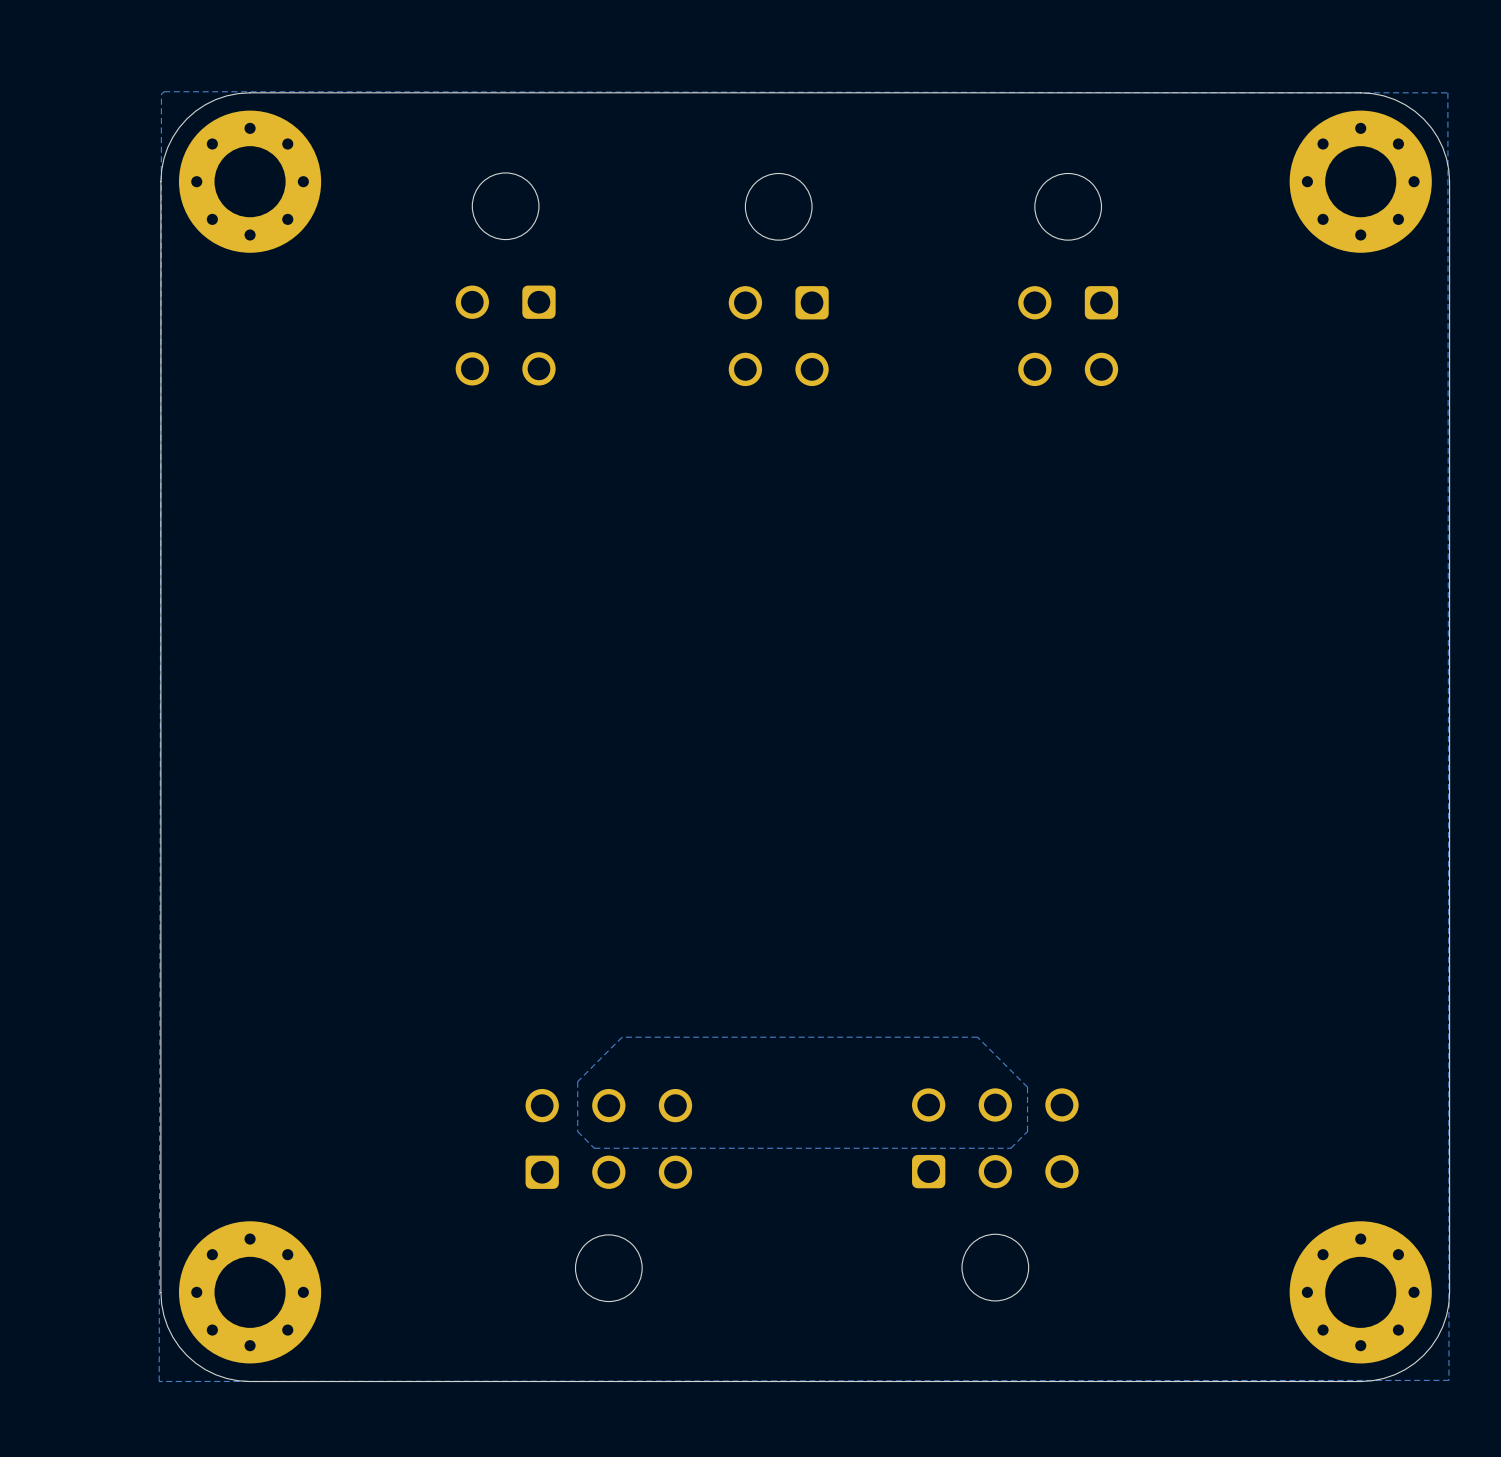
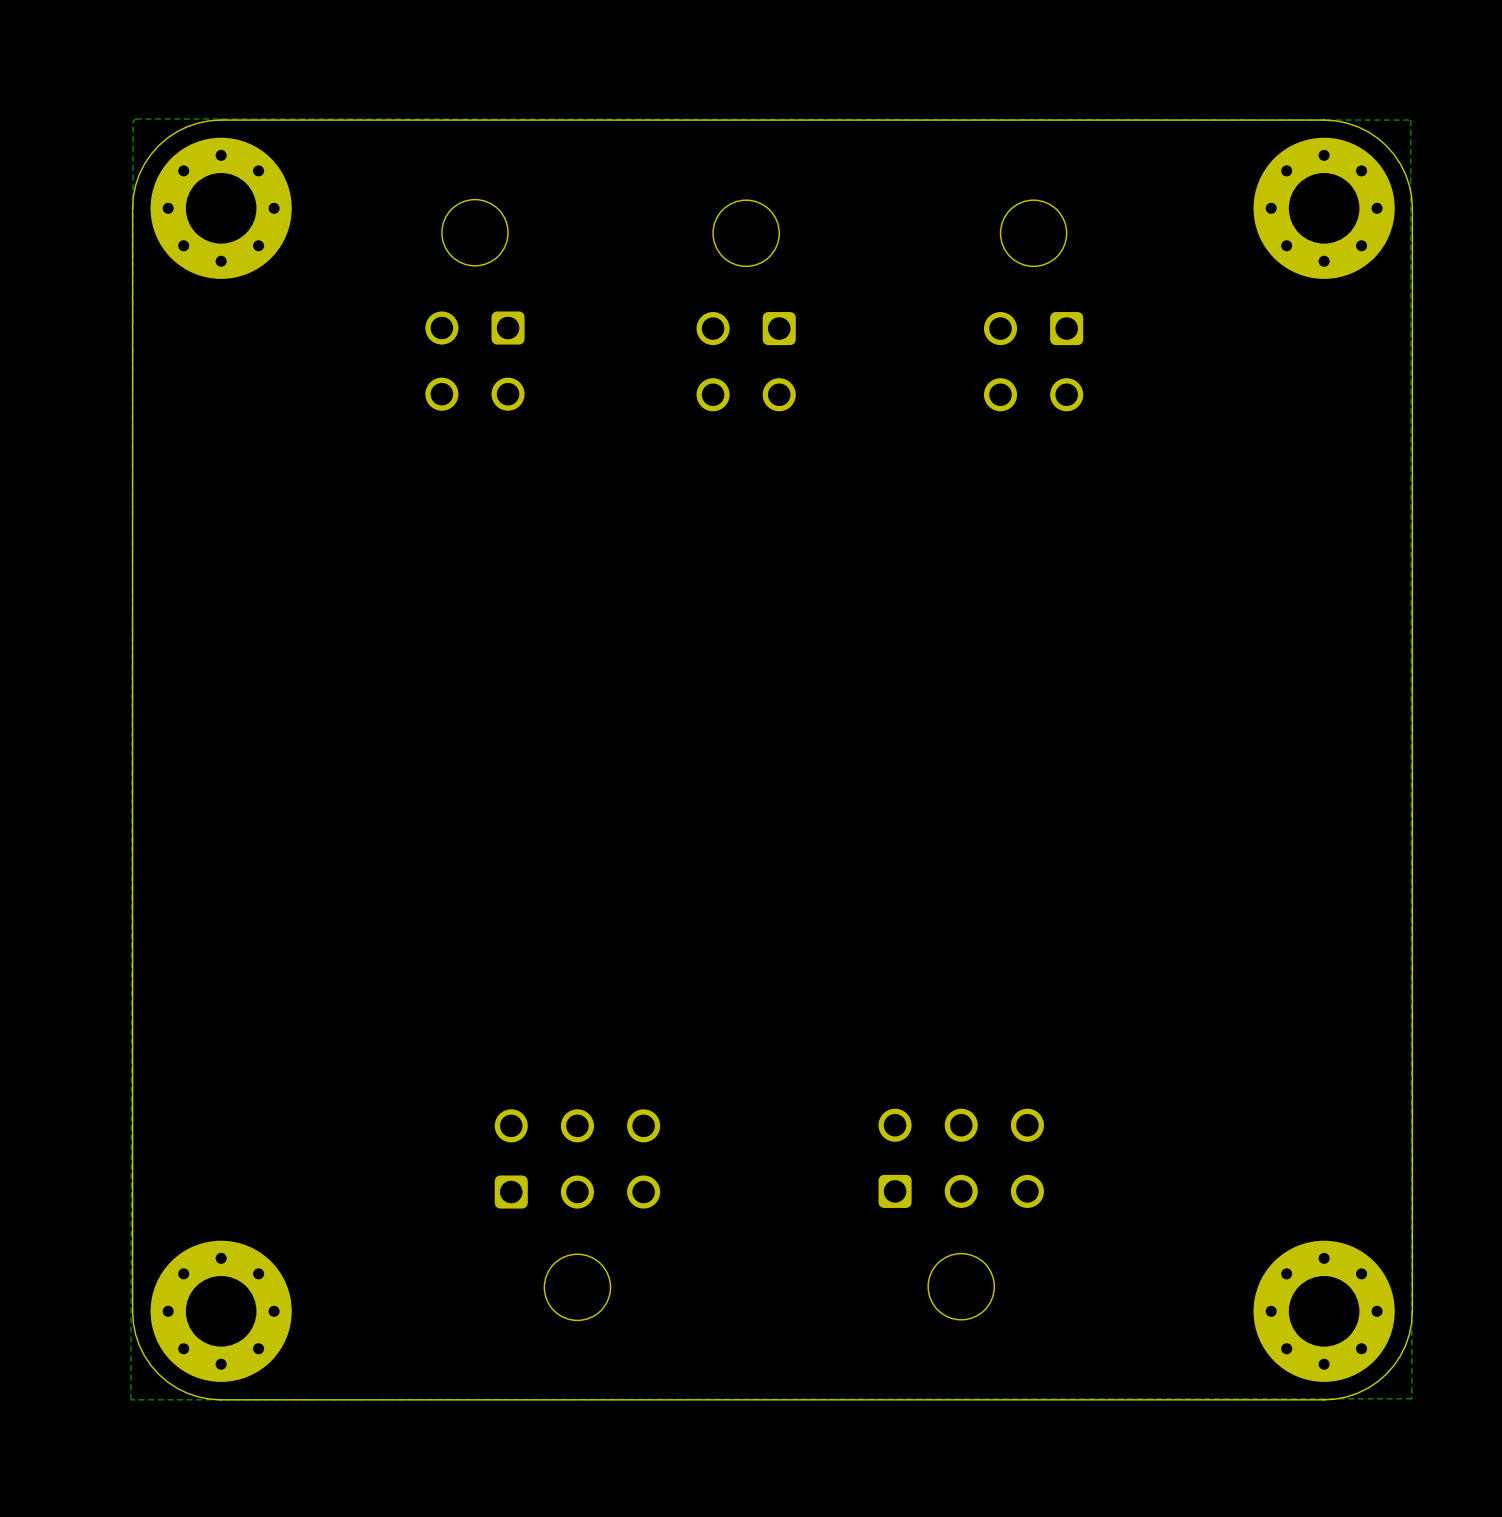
zone outline: (977, 1037) (1027, 1087) (1027, 1131) (1010, 1148) (594, 1148) (577, 1131) (577, 1081) (622, 1037) (977, 1037) -> none

